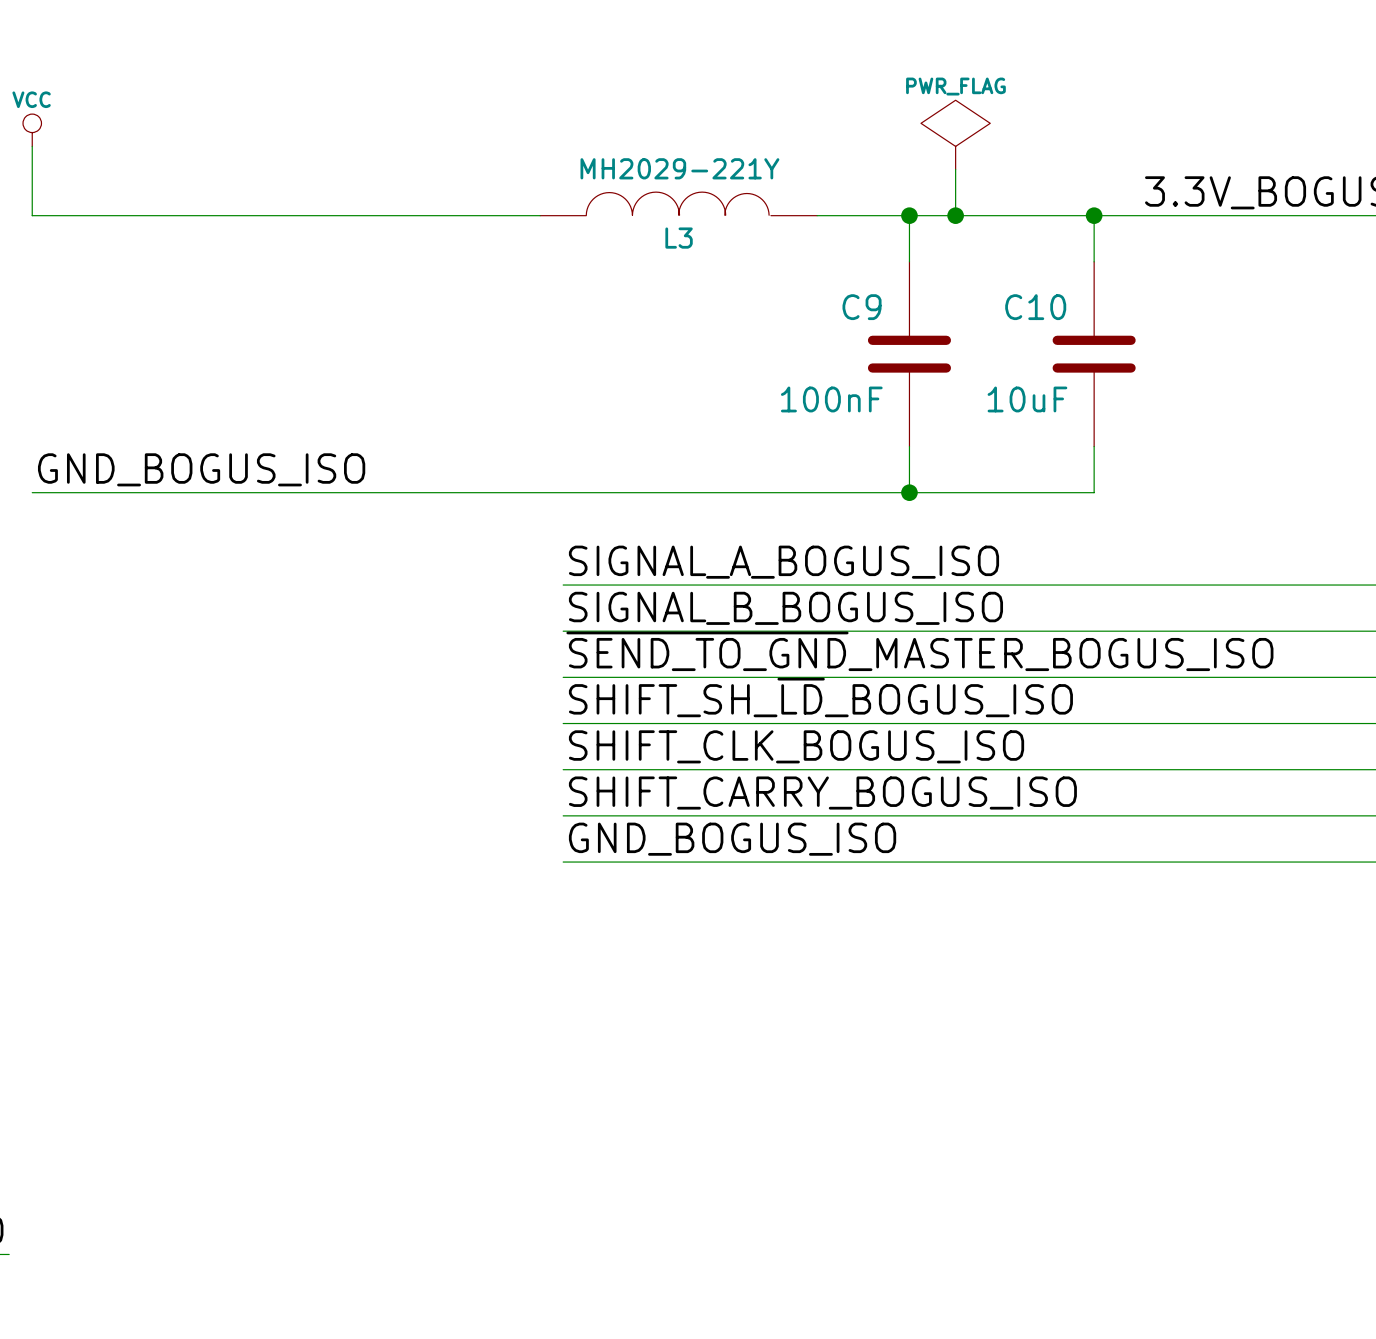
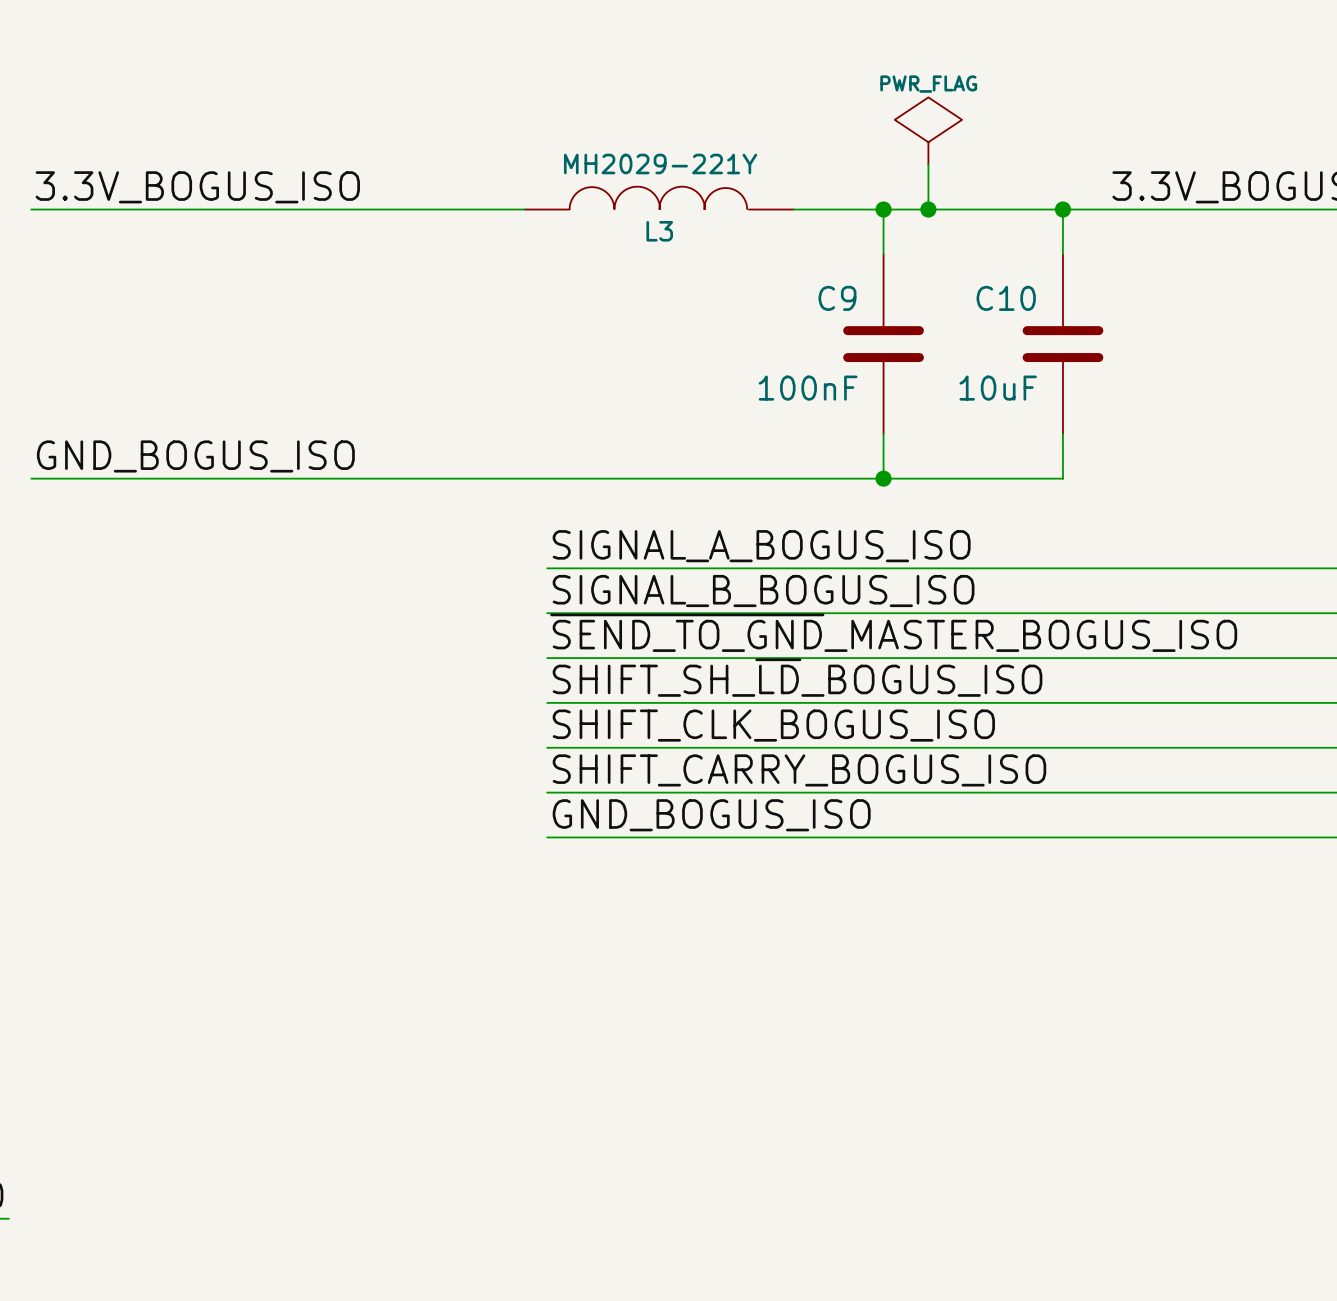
power symbol: VCC (32, 130) -> none
wire: (32, 146) (32, 215) -> none
label: none -> 3.3V_BOGUS_ISO (197, 187)

